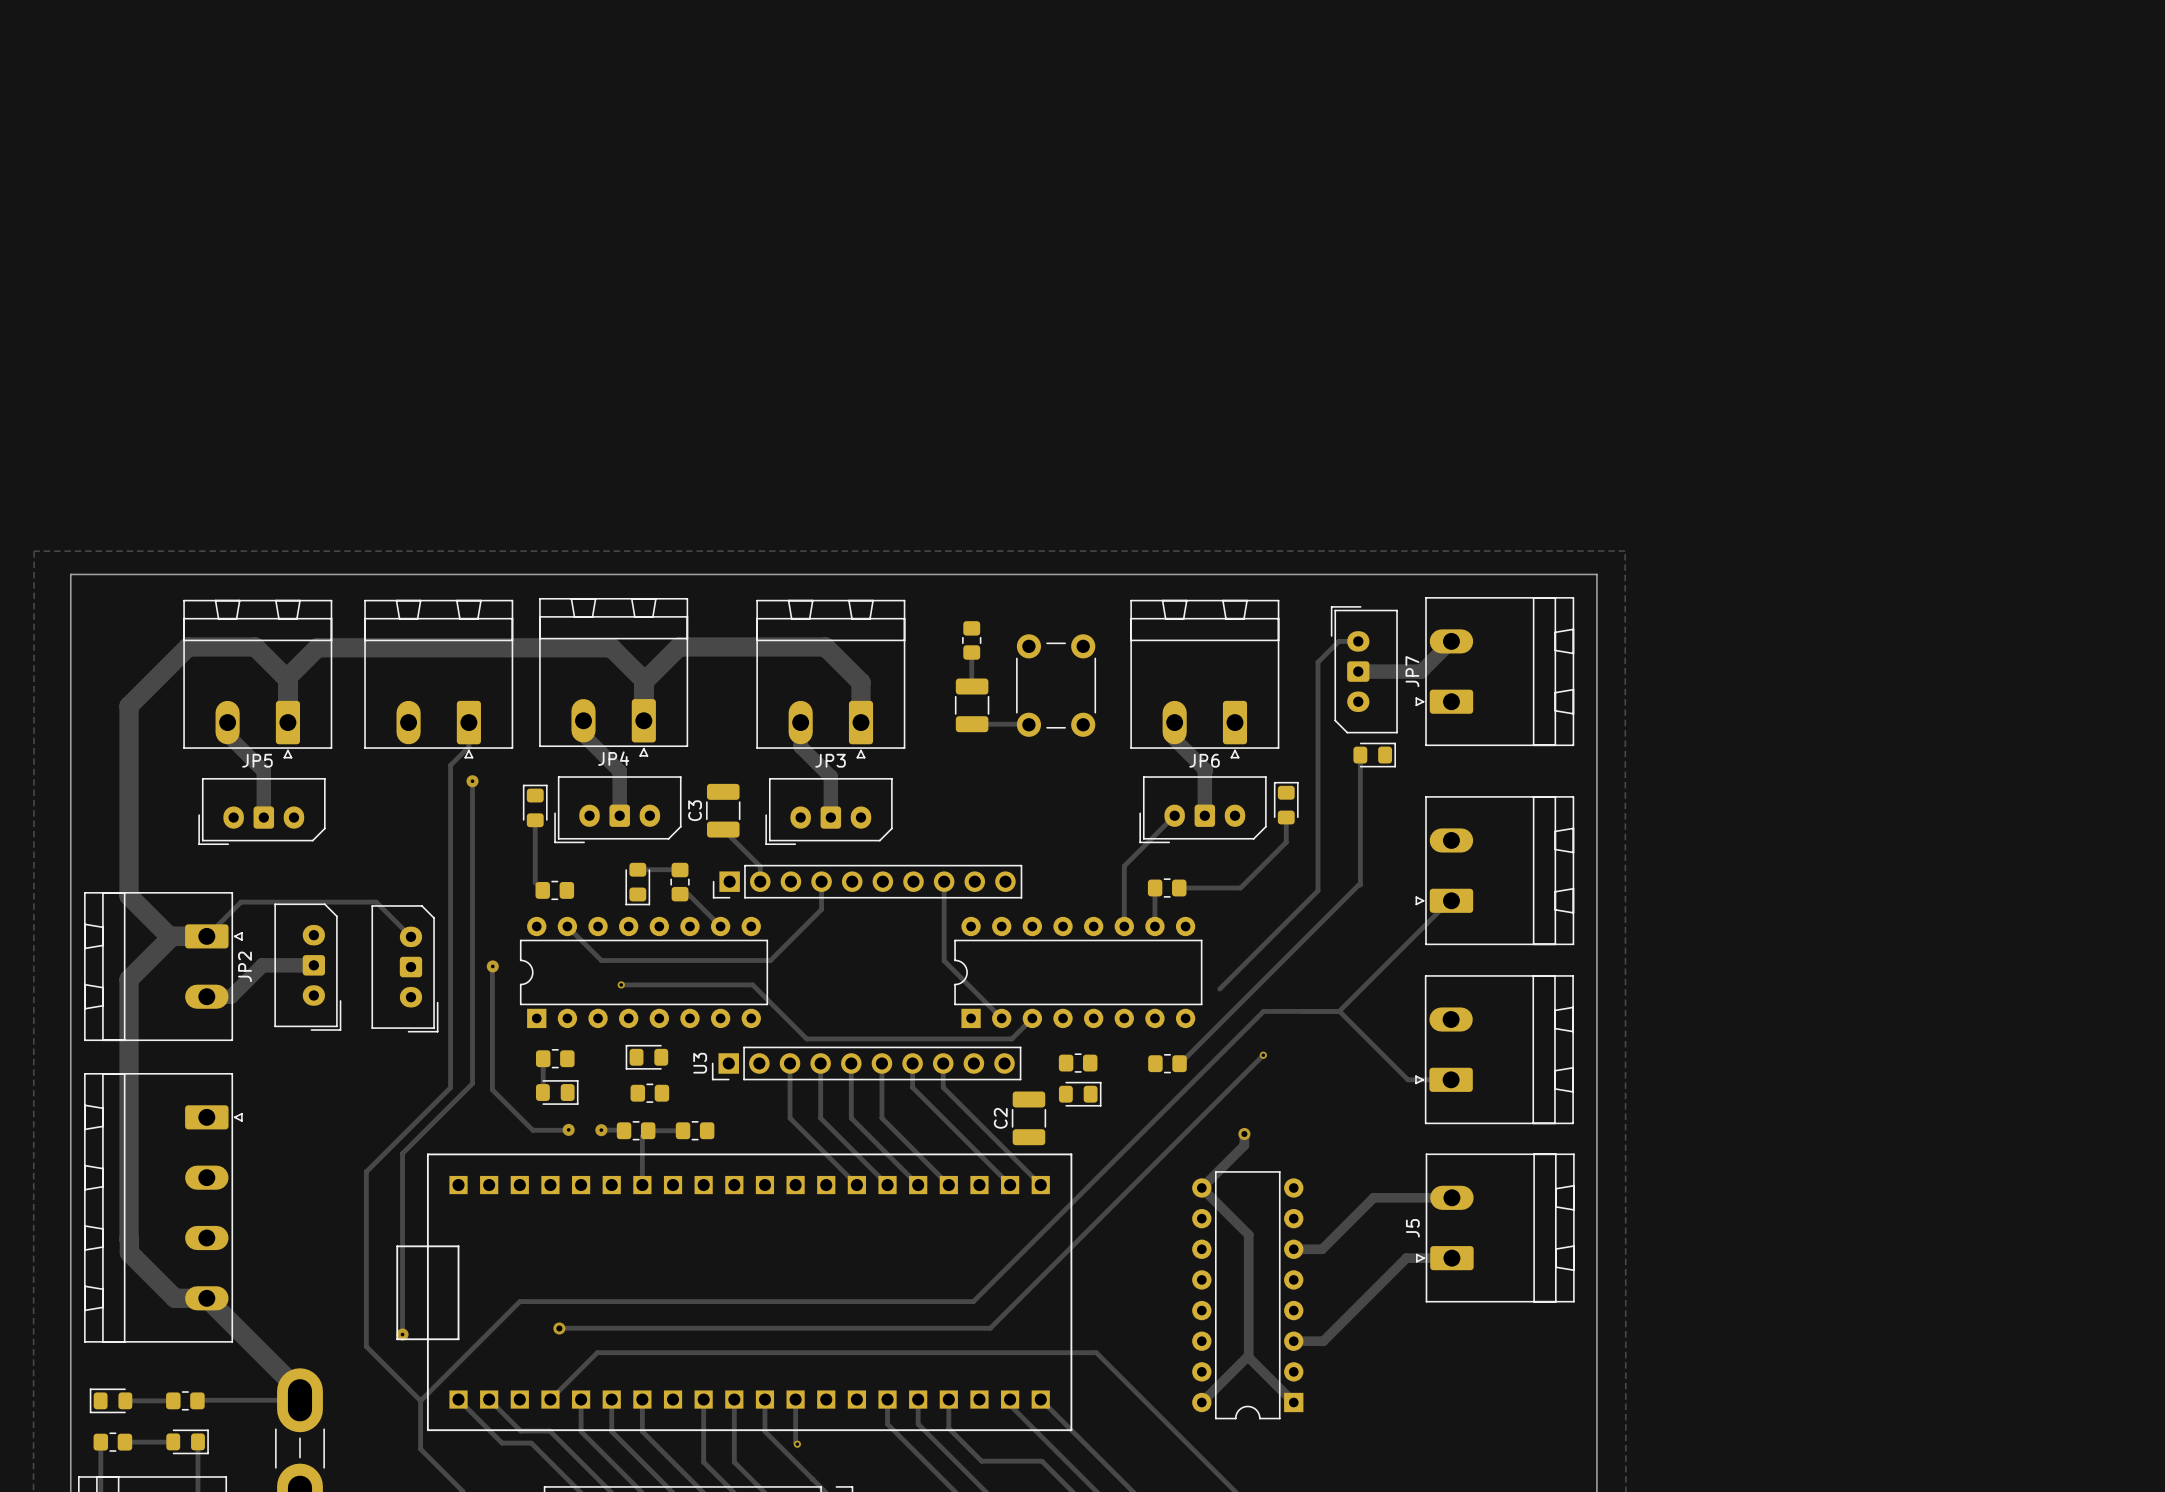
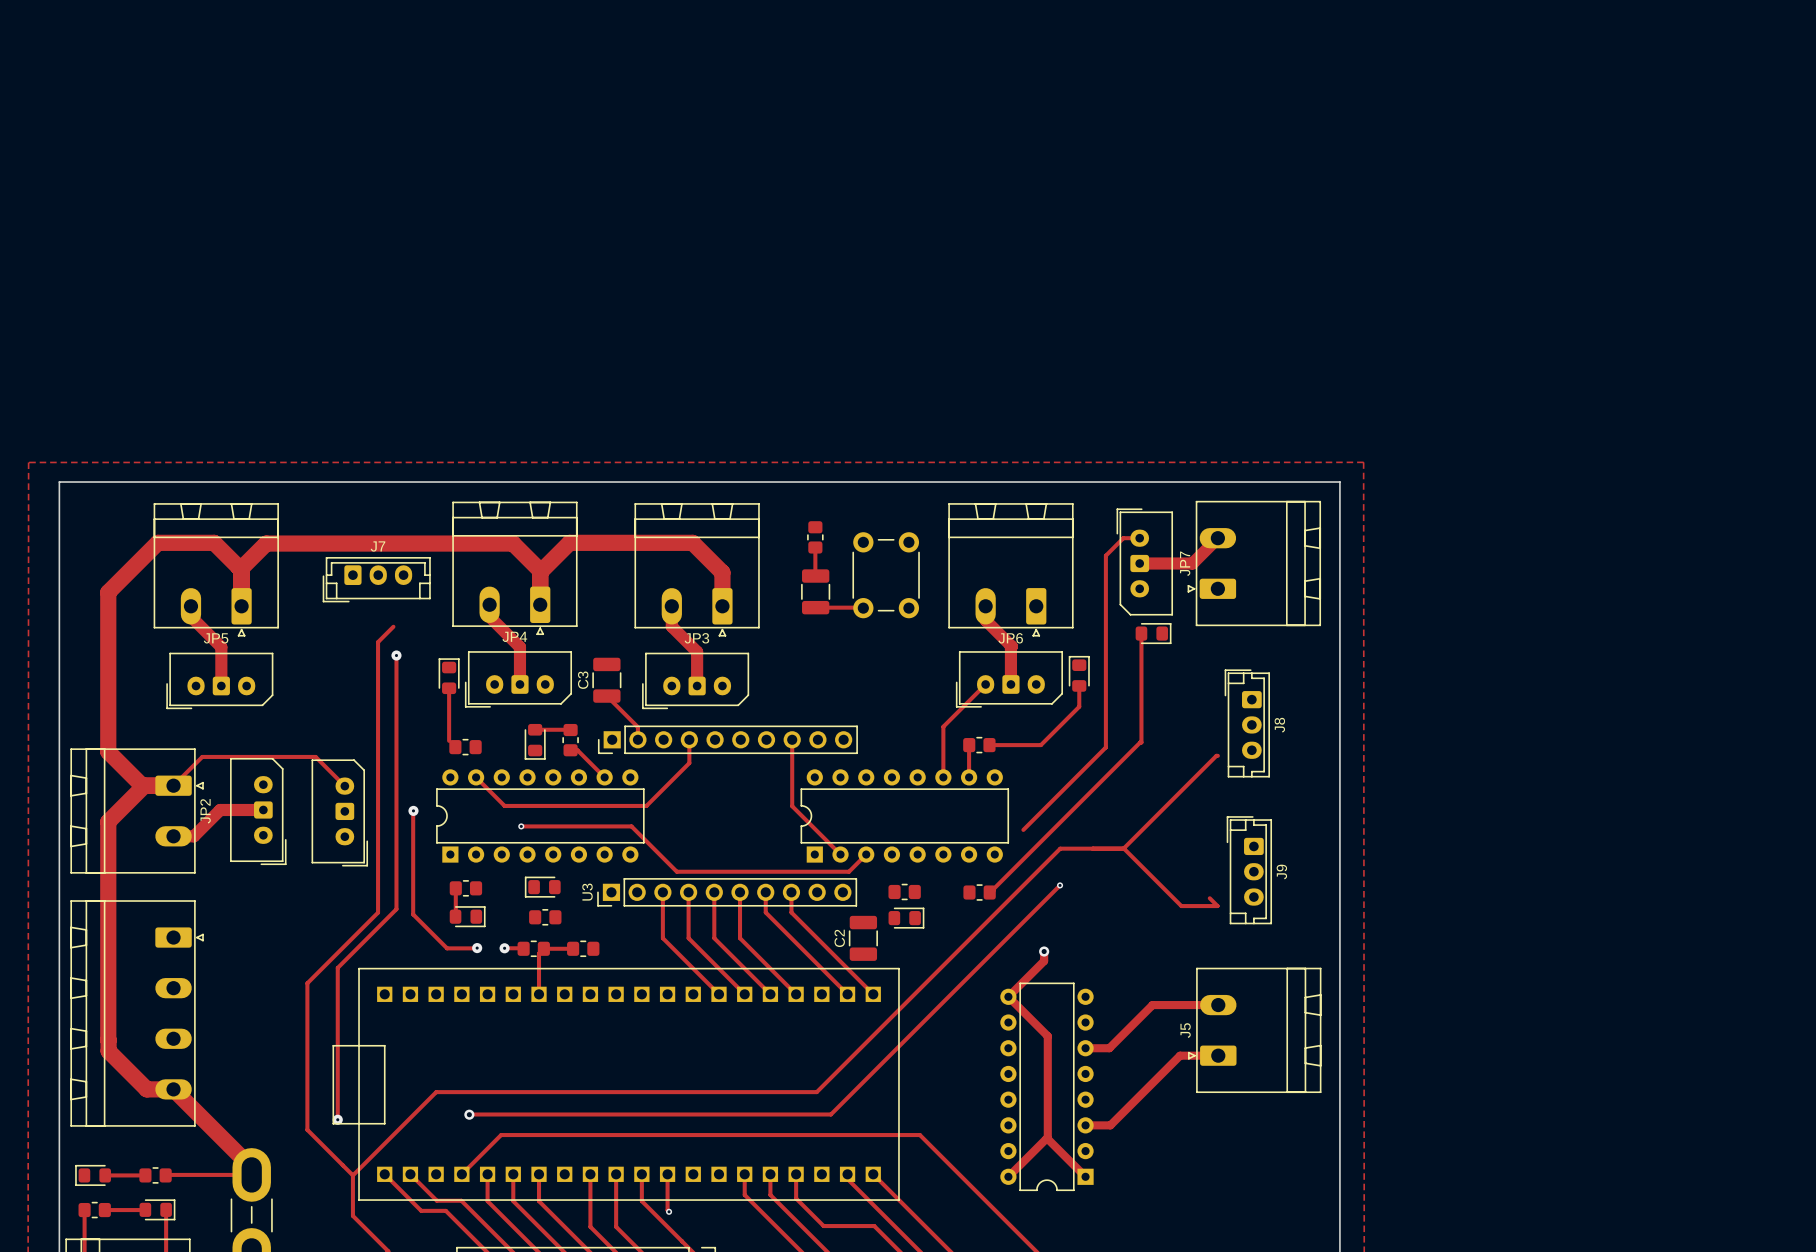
part: (438, 679) -> none
J7: none -> (376, 579)
J8: none -> (1247, 723)
part: (1494, 870) -> none
J9: none -> (1249, 870)
part: (1494, 1049) -> none

